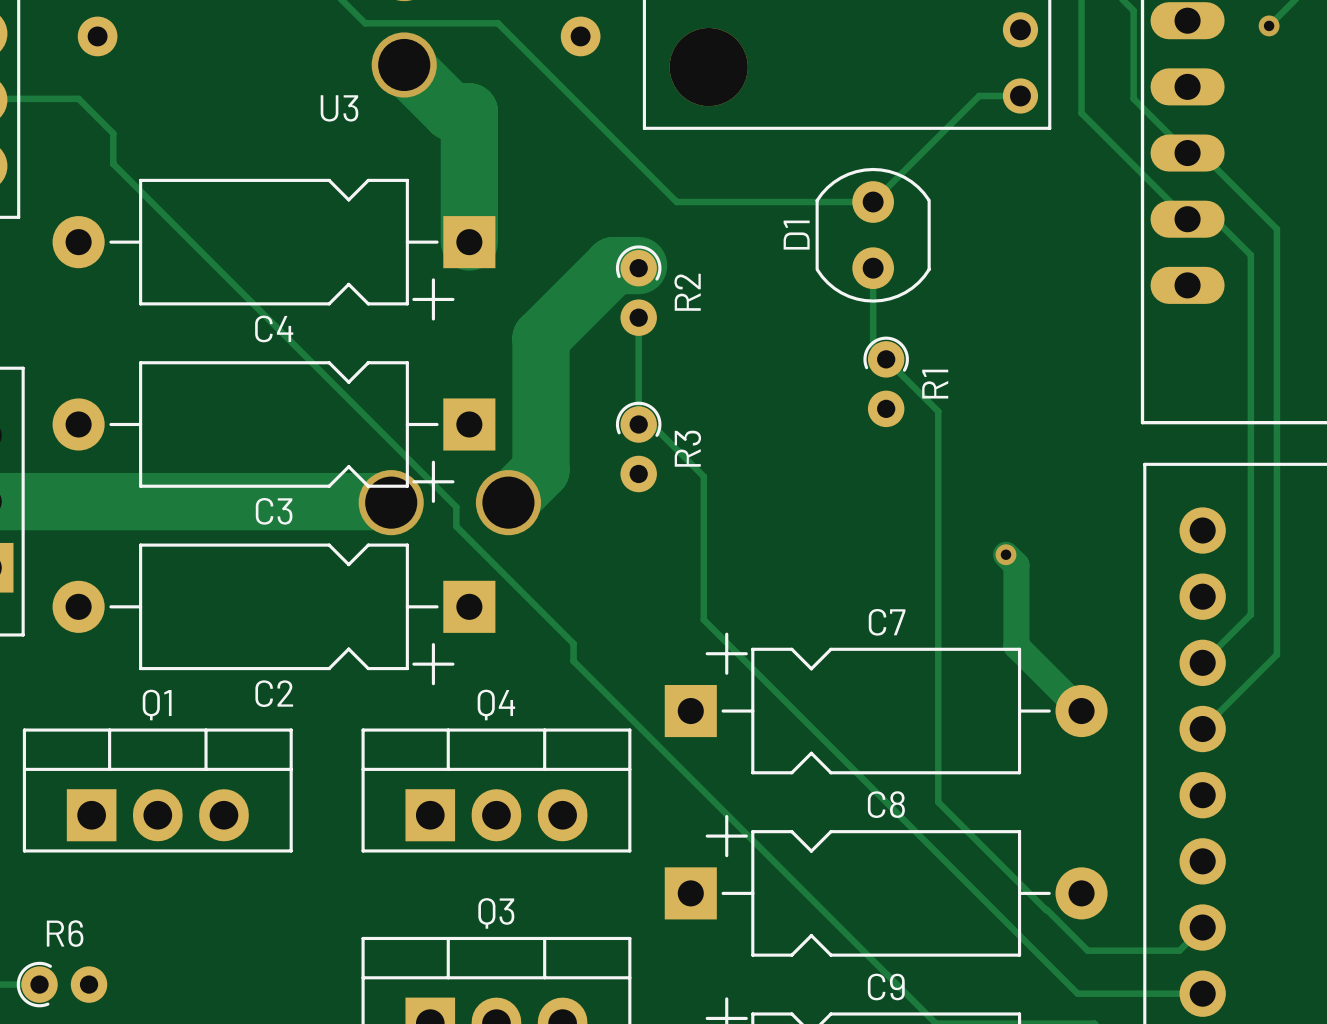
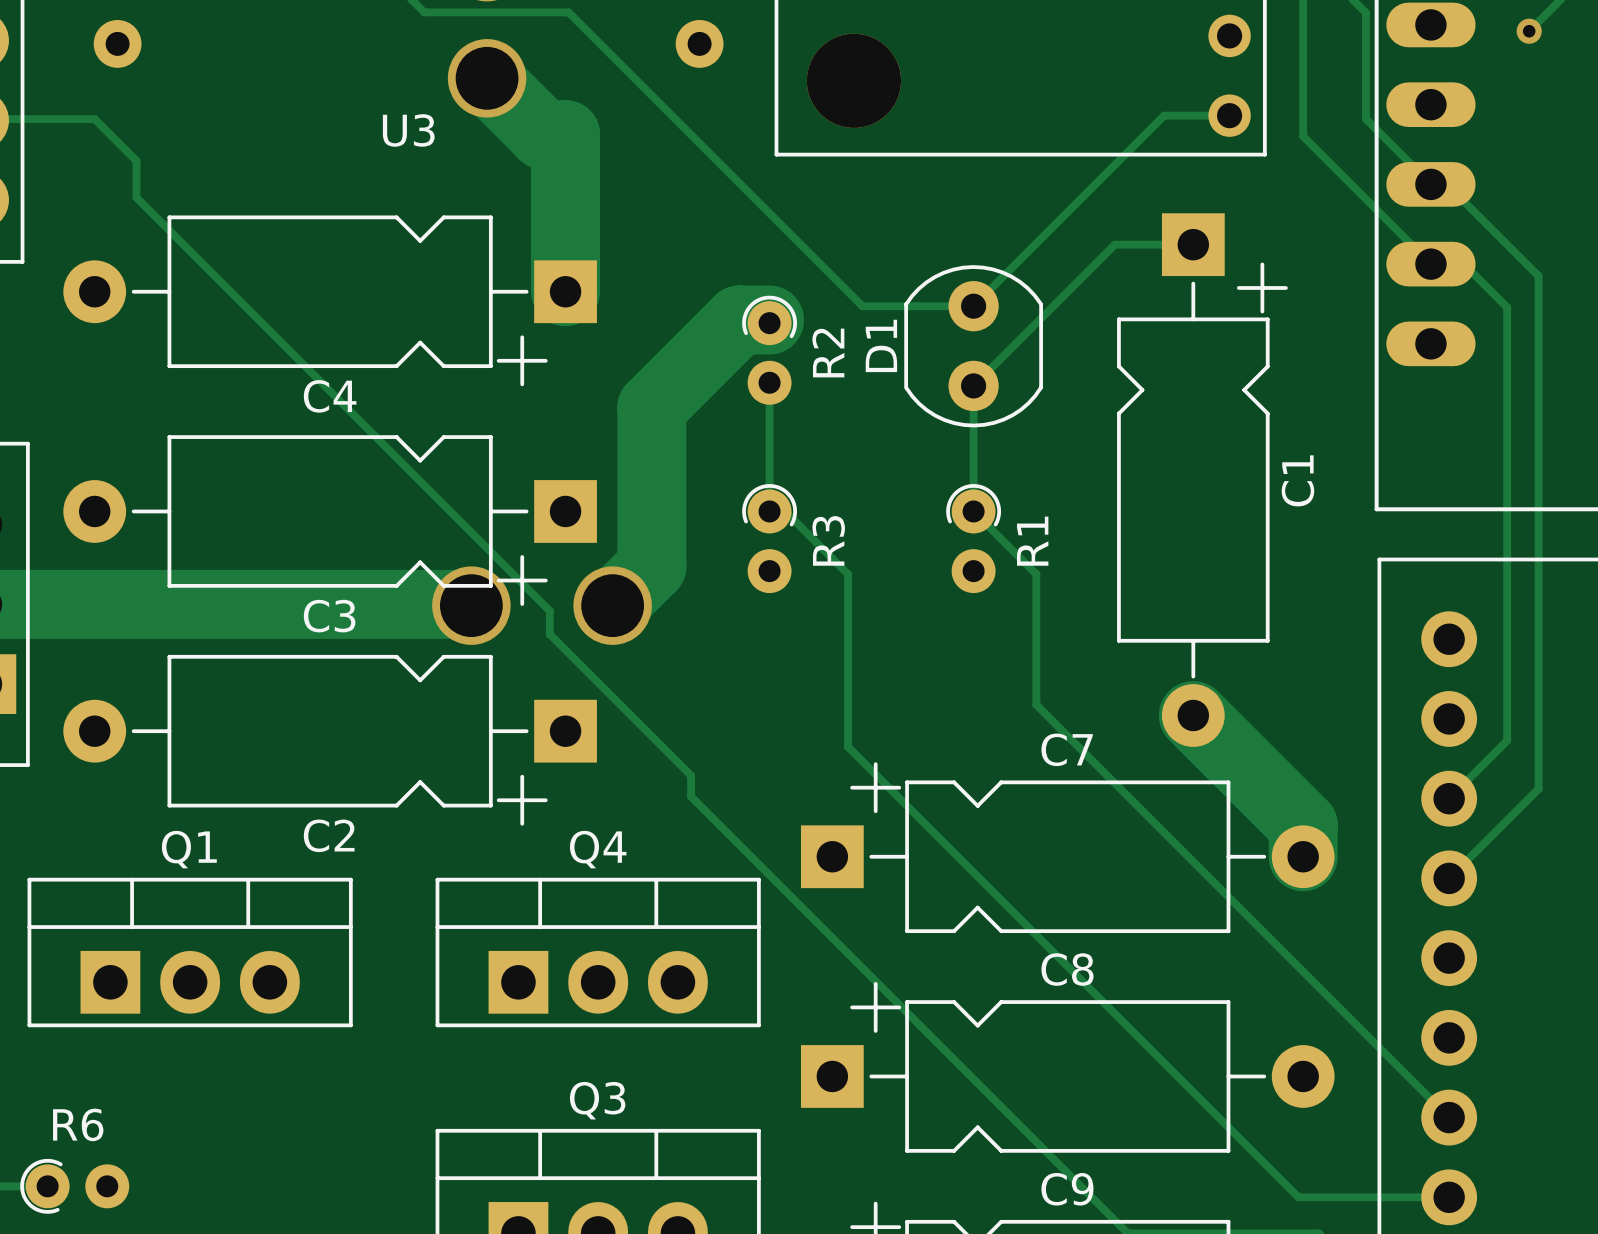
track: (352, 10) (365, 23) (498, 23) (676, 202) (873, 202) (979, 95) -> (424, 12) (568, 12) (862, 306) (973, 306) (1164, 115) (1179, 115)
D1 position: (873, 235) -> (973, 346)
track: (873, 268) (873, 346) (938, 411) (938, 802) (1087, 950) (1179, 950) (1202, 927) -> (1193, 244) (1114, 244) (973, 385) (973, 511) (1036, 574) (1036, 704) (1449, 1117)
R1 position: (886, 381) -> (973, 538)
C1: none -> (1202, 480)
track: (1006, 554) (1016, 565) (1016, 645) (1081, 711) -> (1193, 715) (1303, 825) (1303, 856)
via: (1006, 554) -> none

